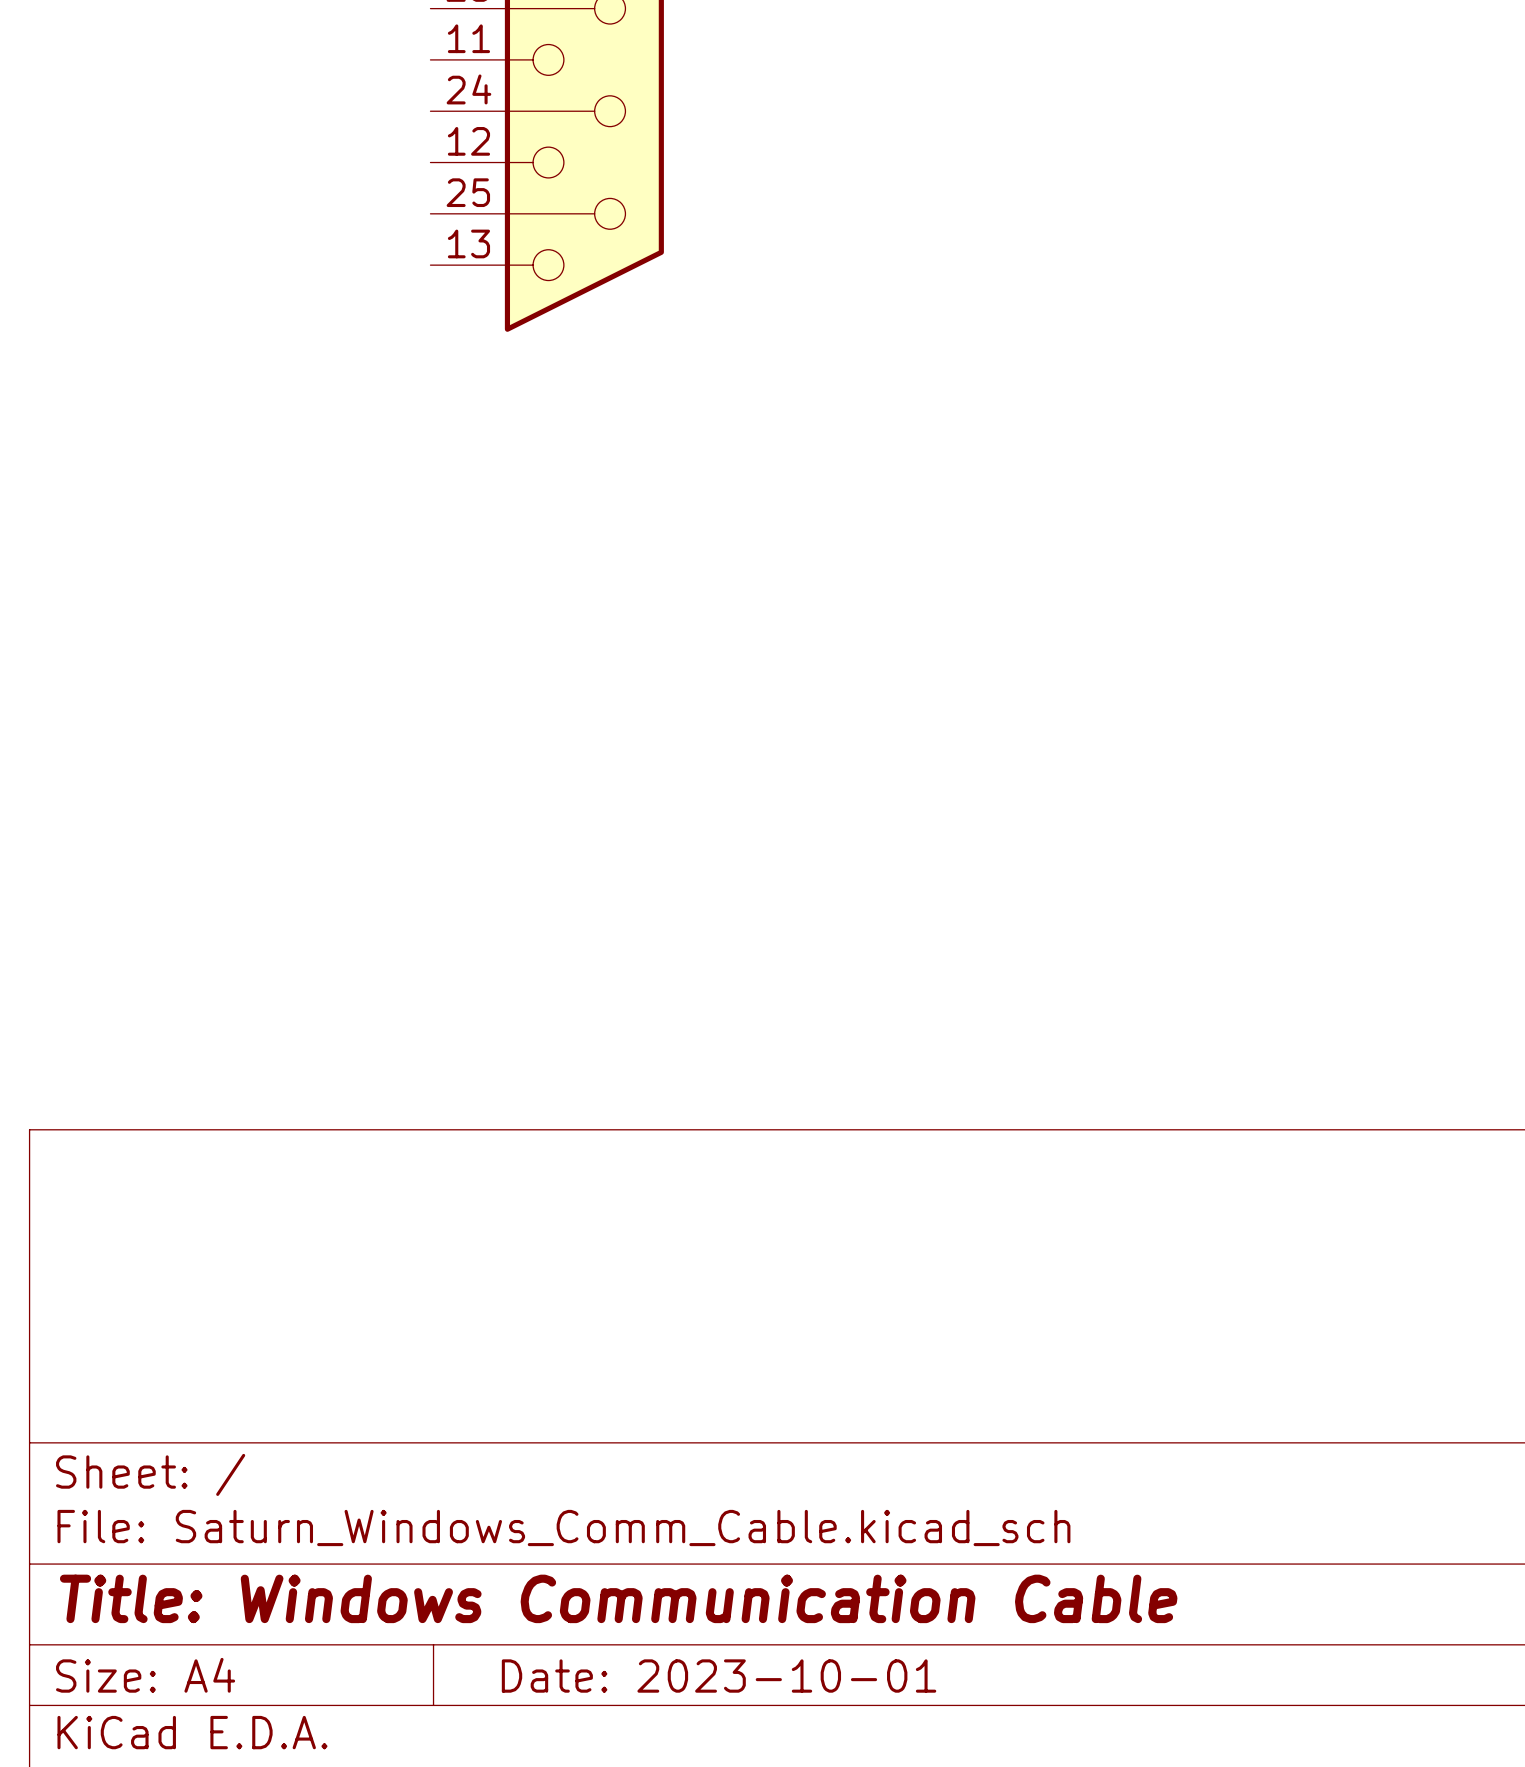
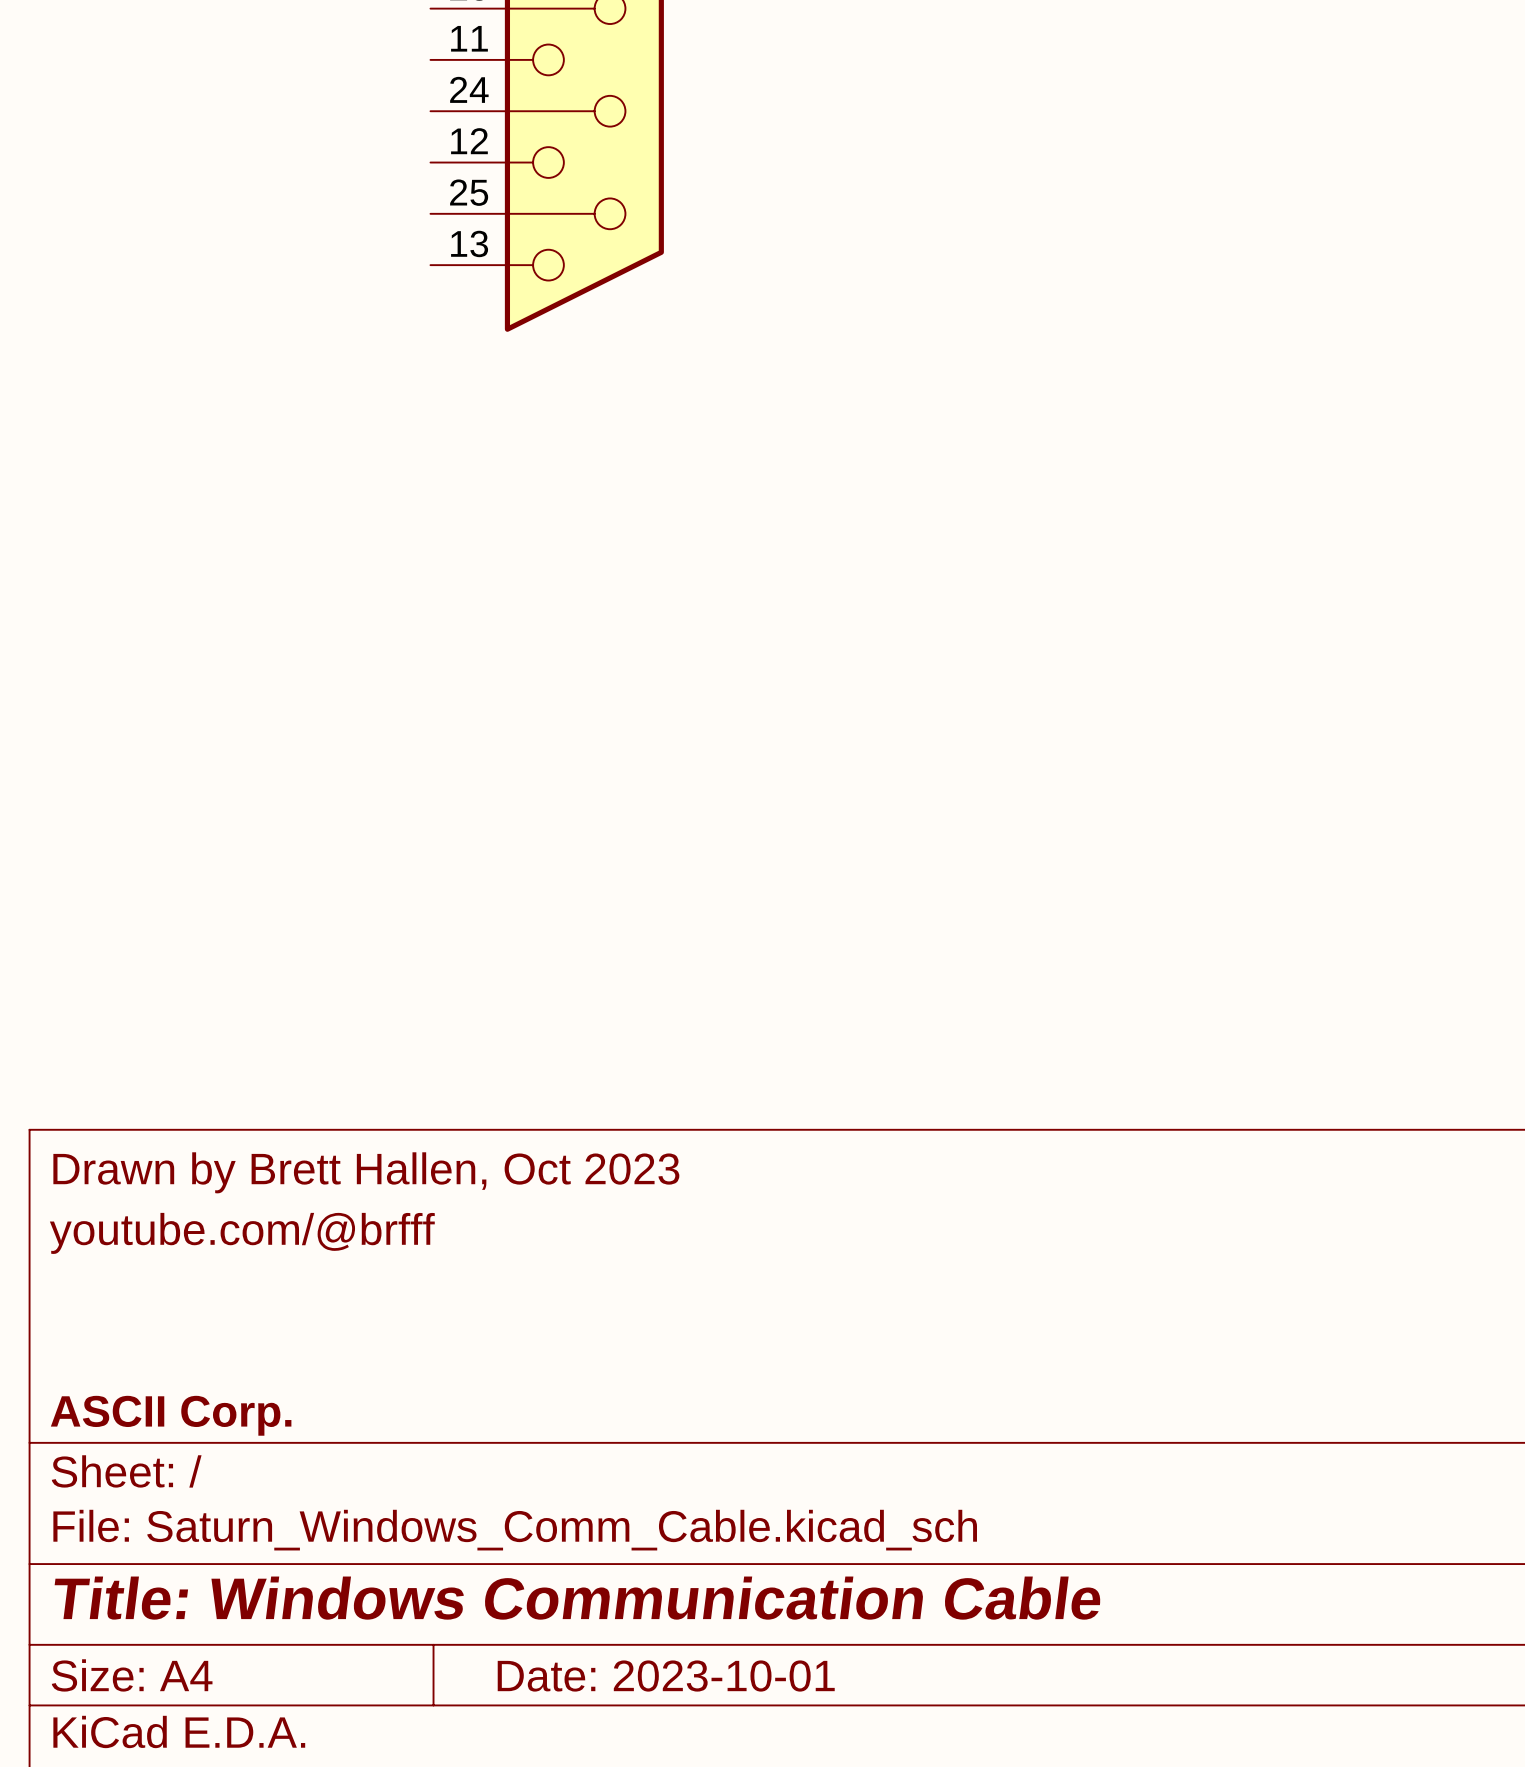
title block: none -> Drawn by Brett Hallen, Oct 2023 (366, 1172)
title block: none -> youtube.com/@brfff (242, 1233)
title block: none -> ASCII Corp. (171, 1415)

